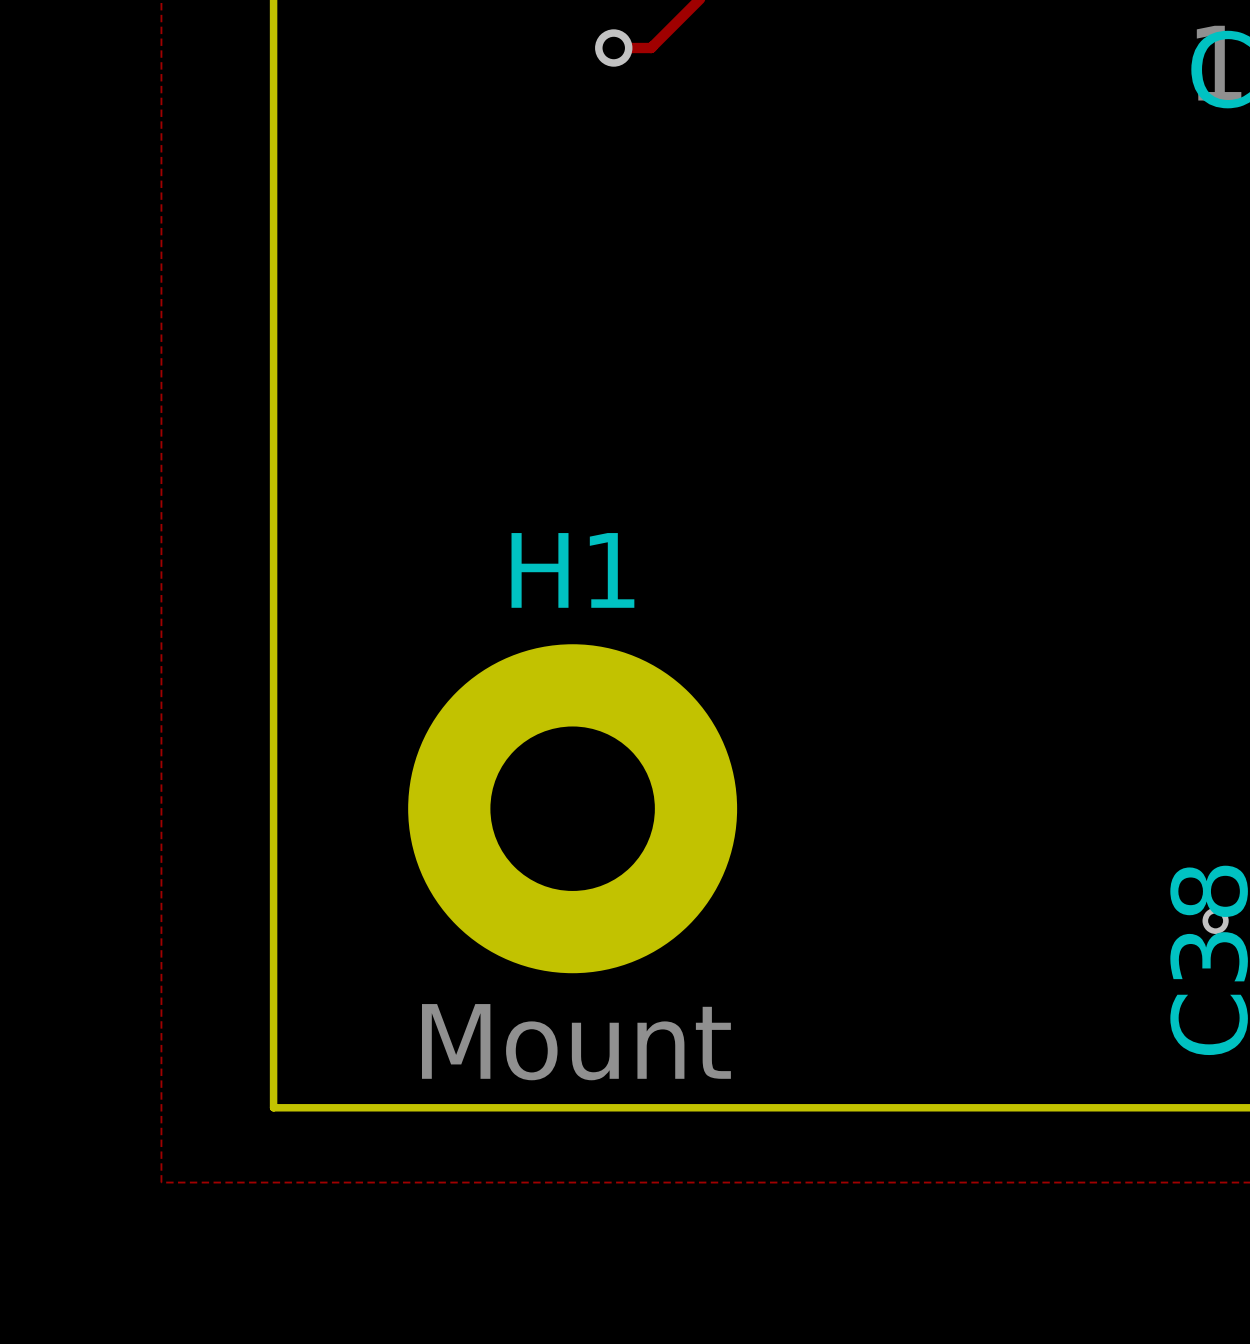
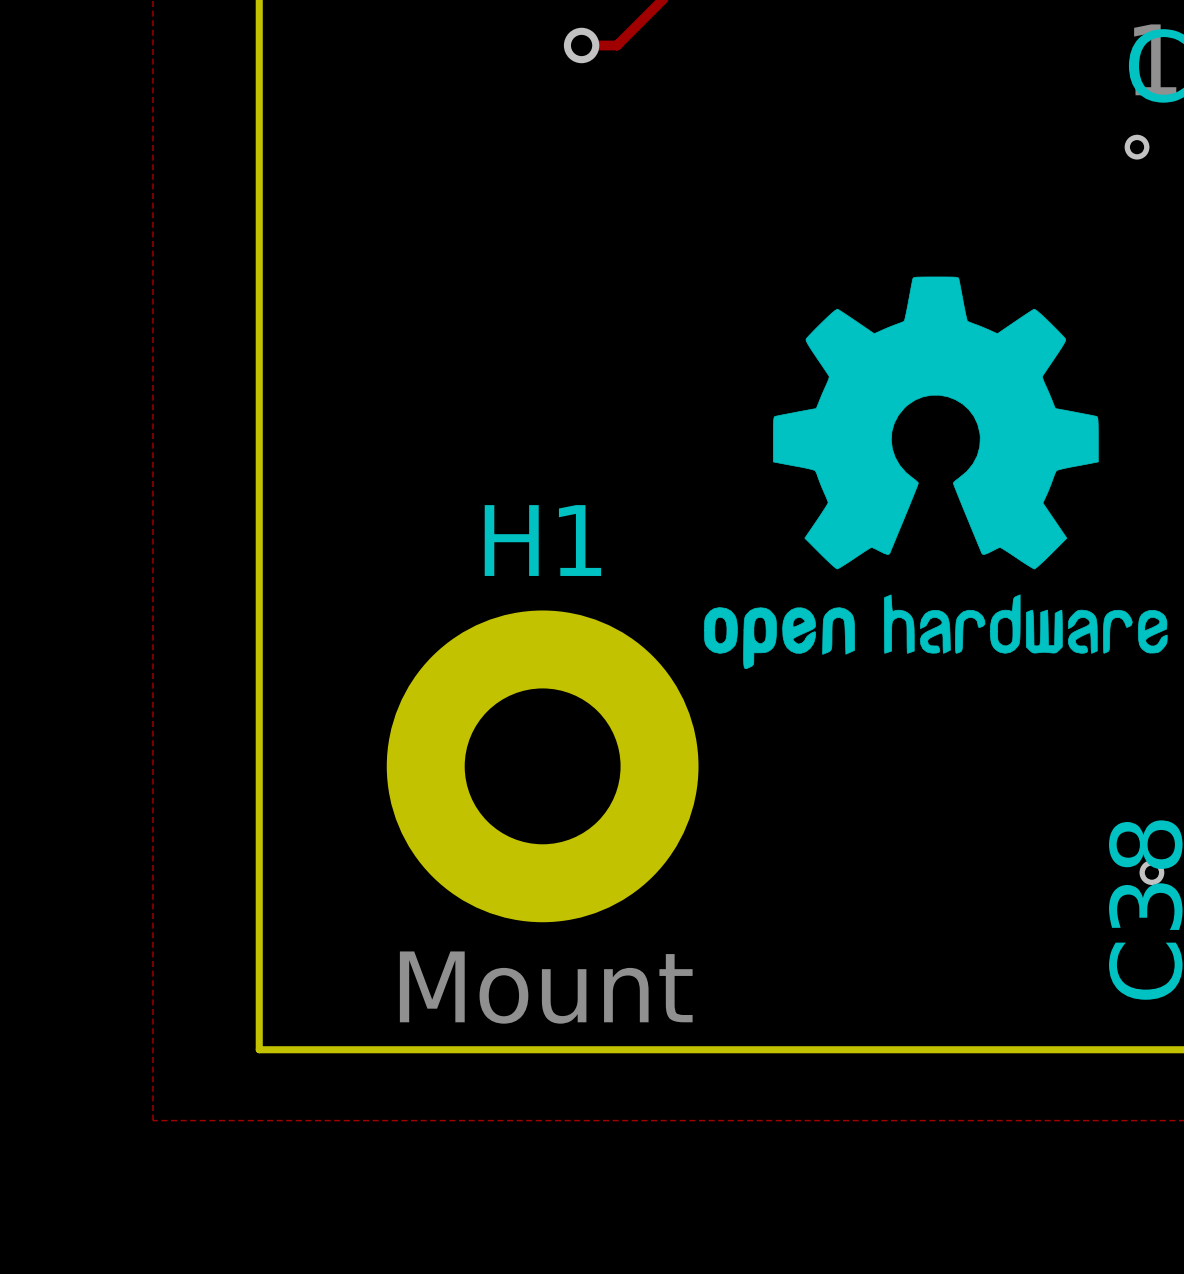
via: none -> (1137, 147)
drawing: none -> [704, 276, 1168, 670]

